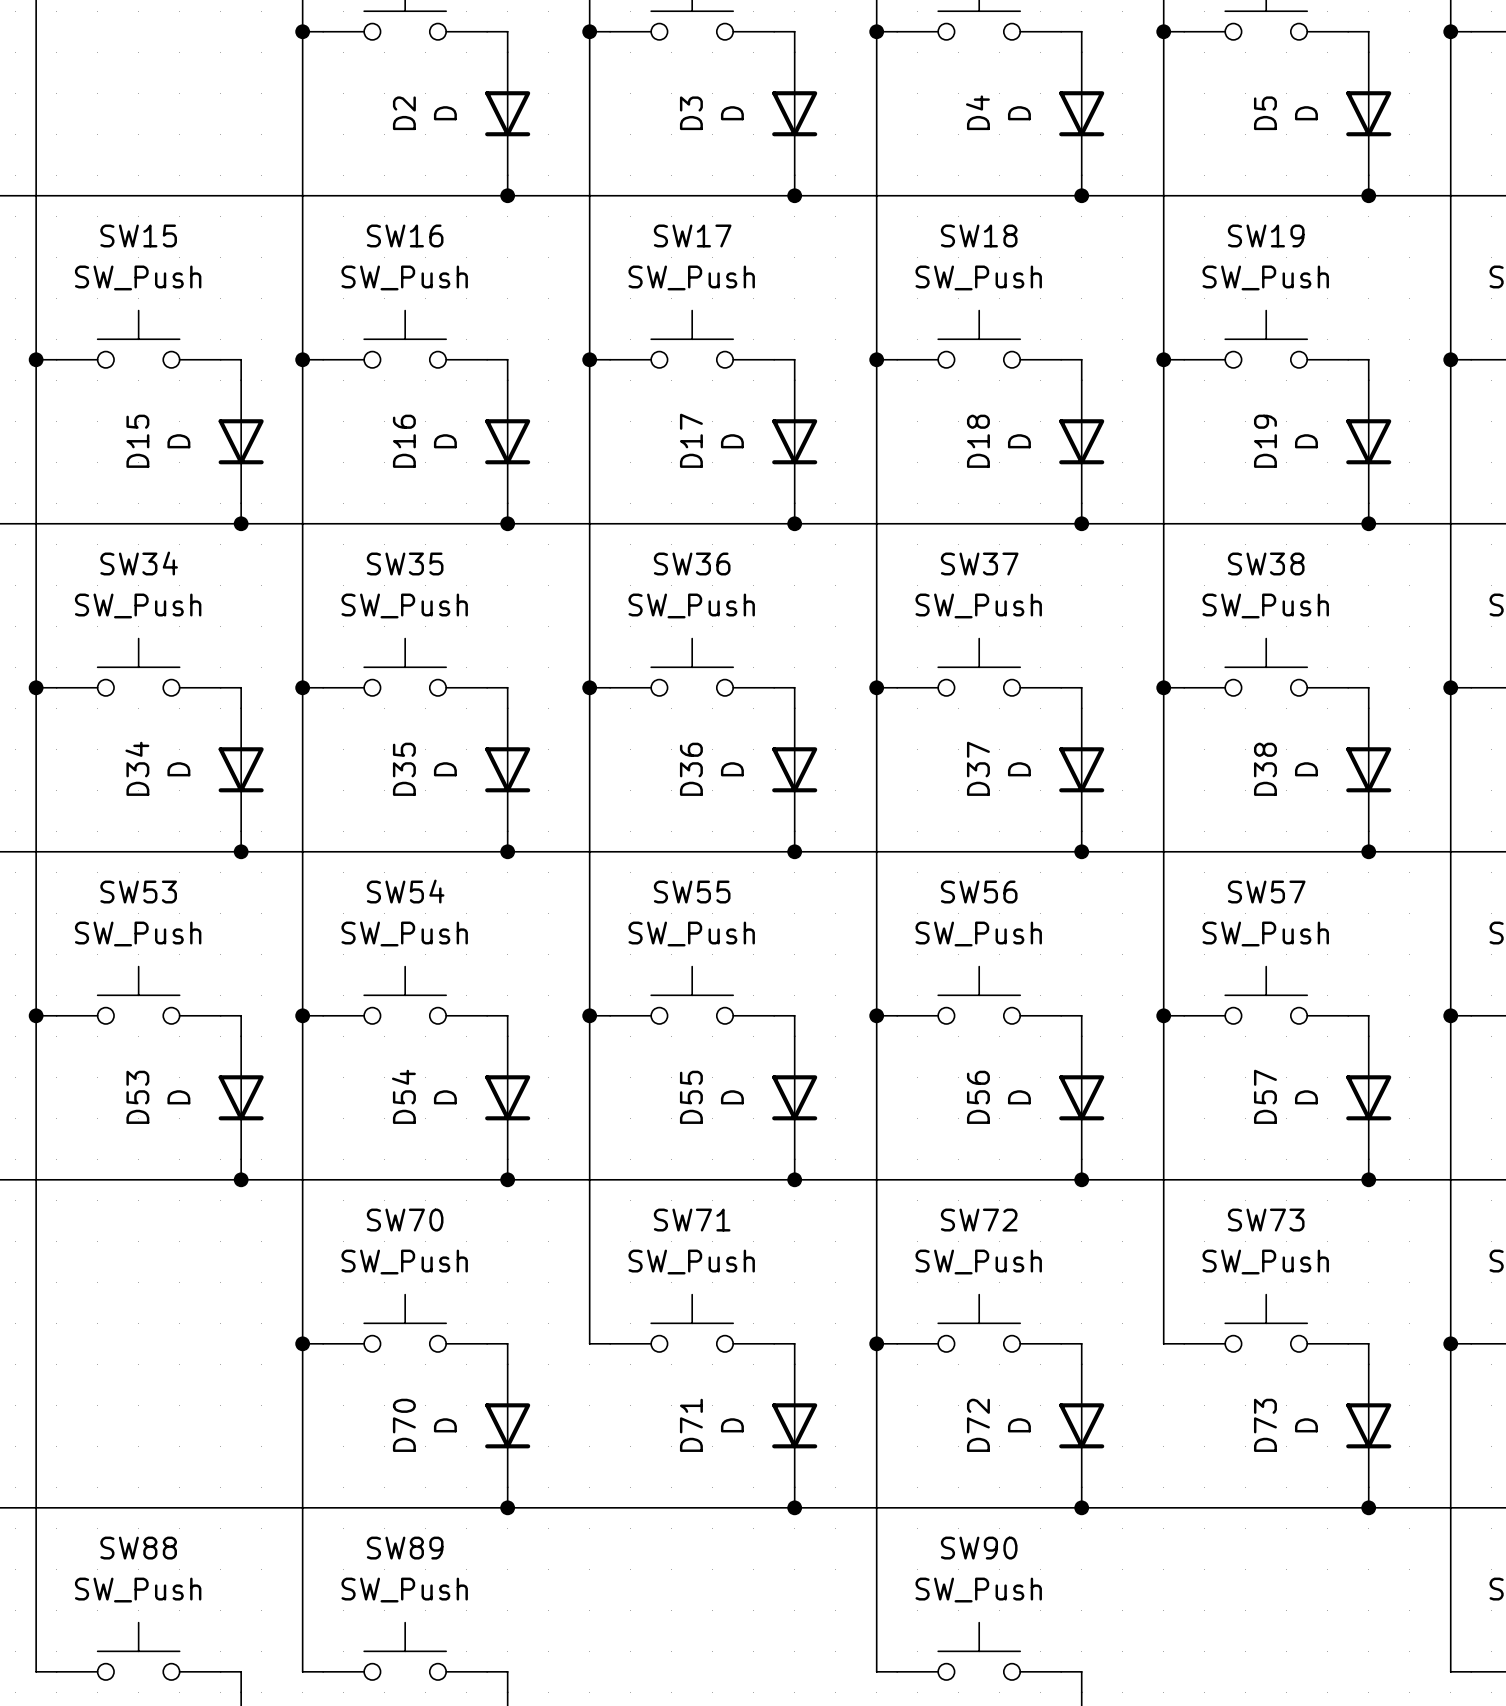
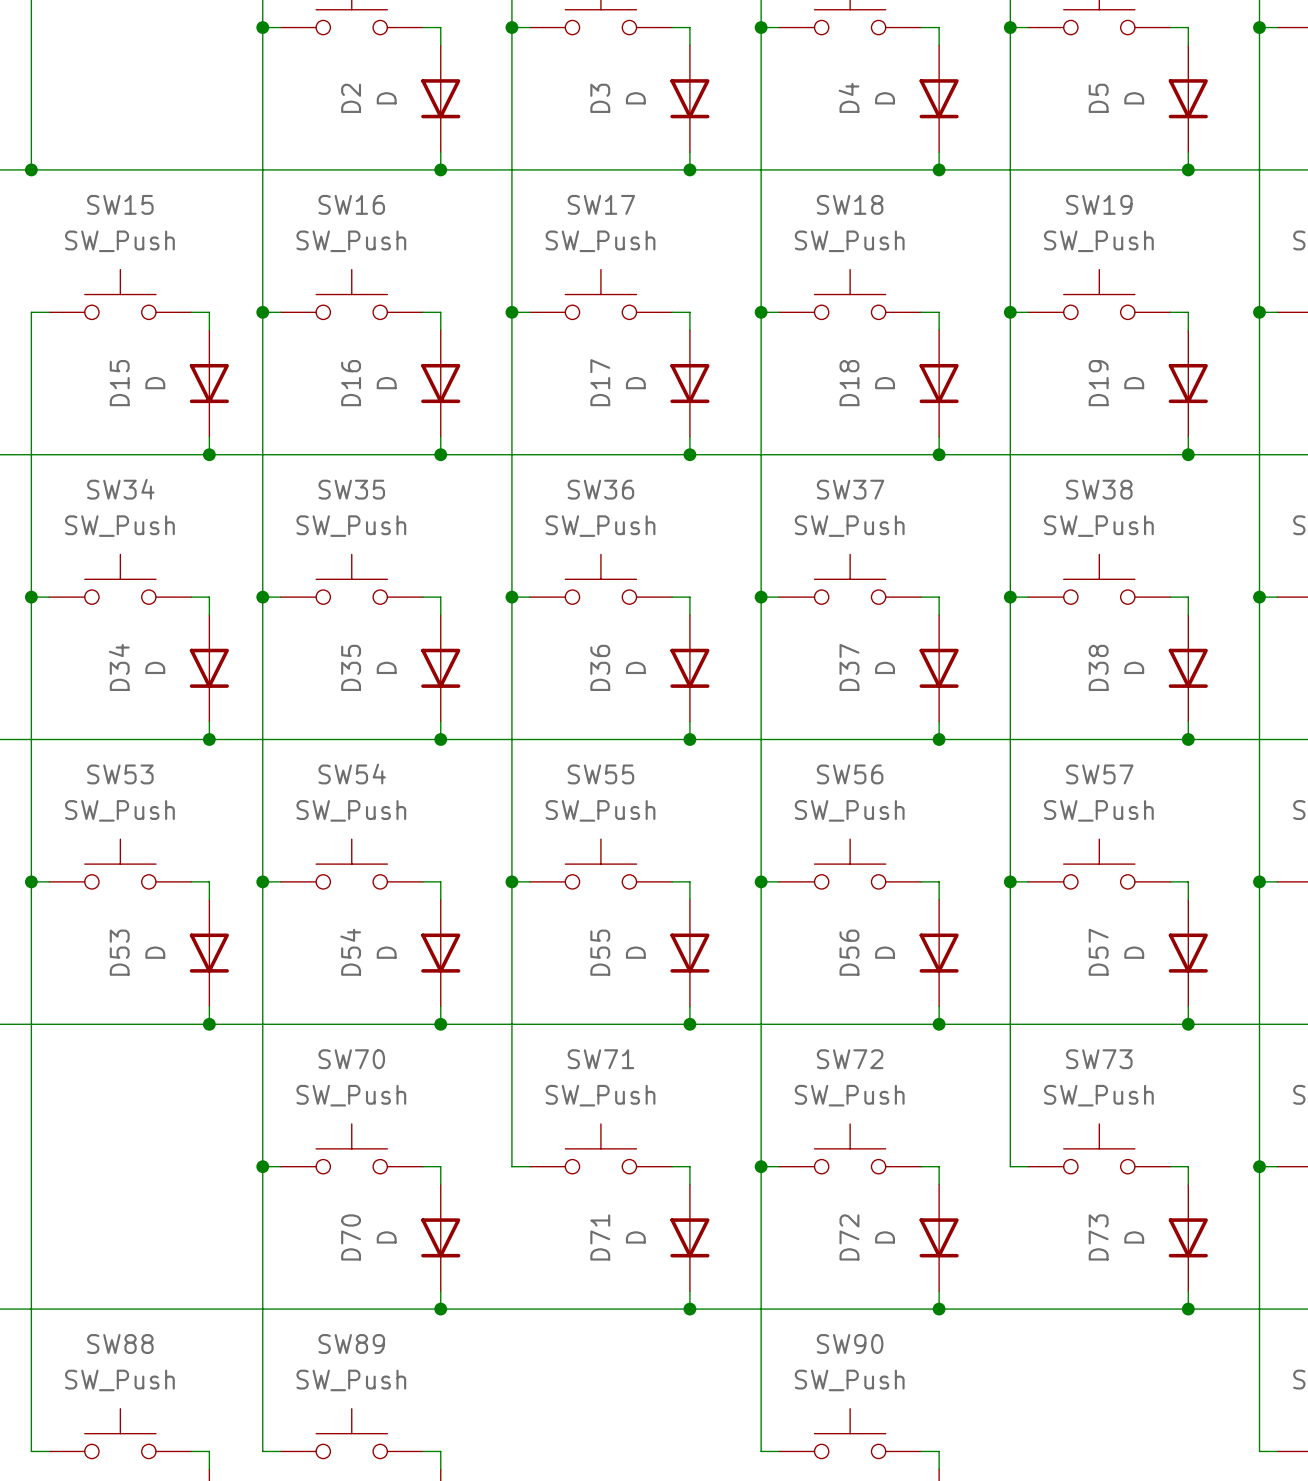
wire: (36, 195) (36, 359) -> none
junction: none -> (31, 169)
junction: (36, 359) -> none

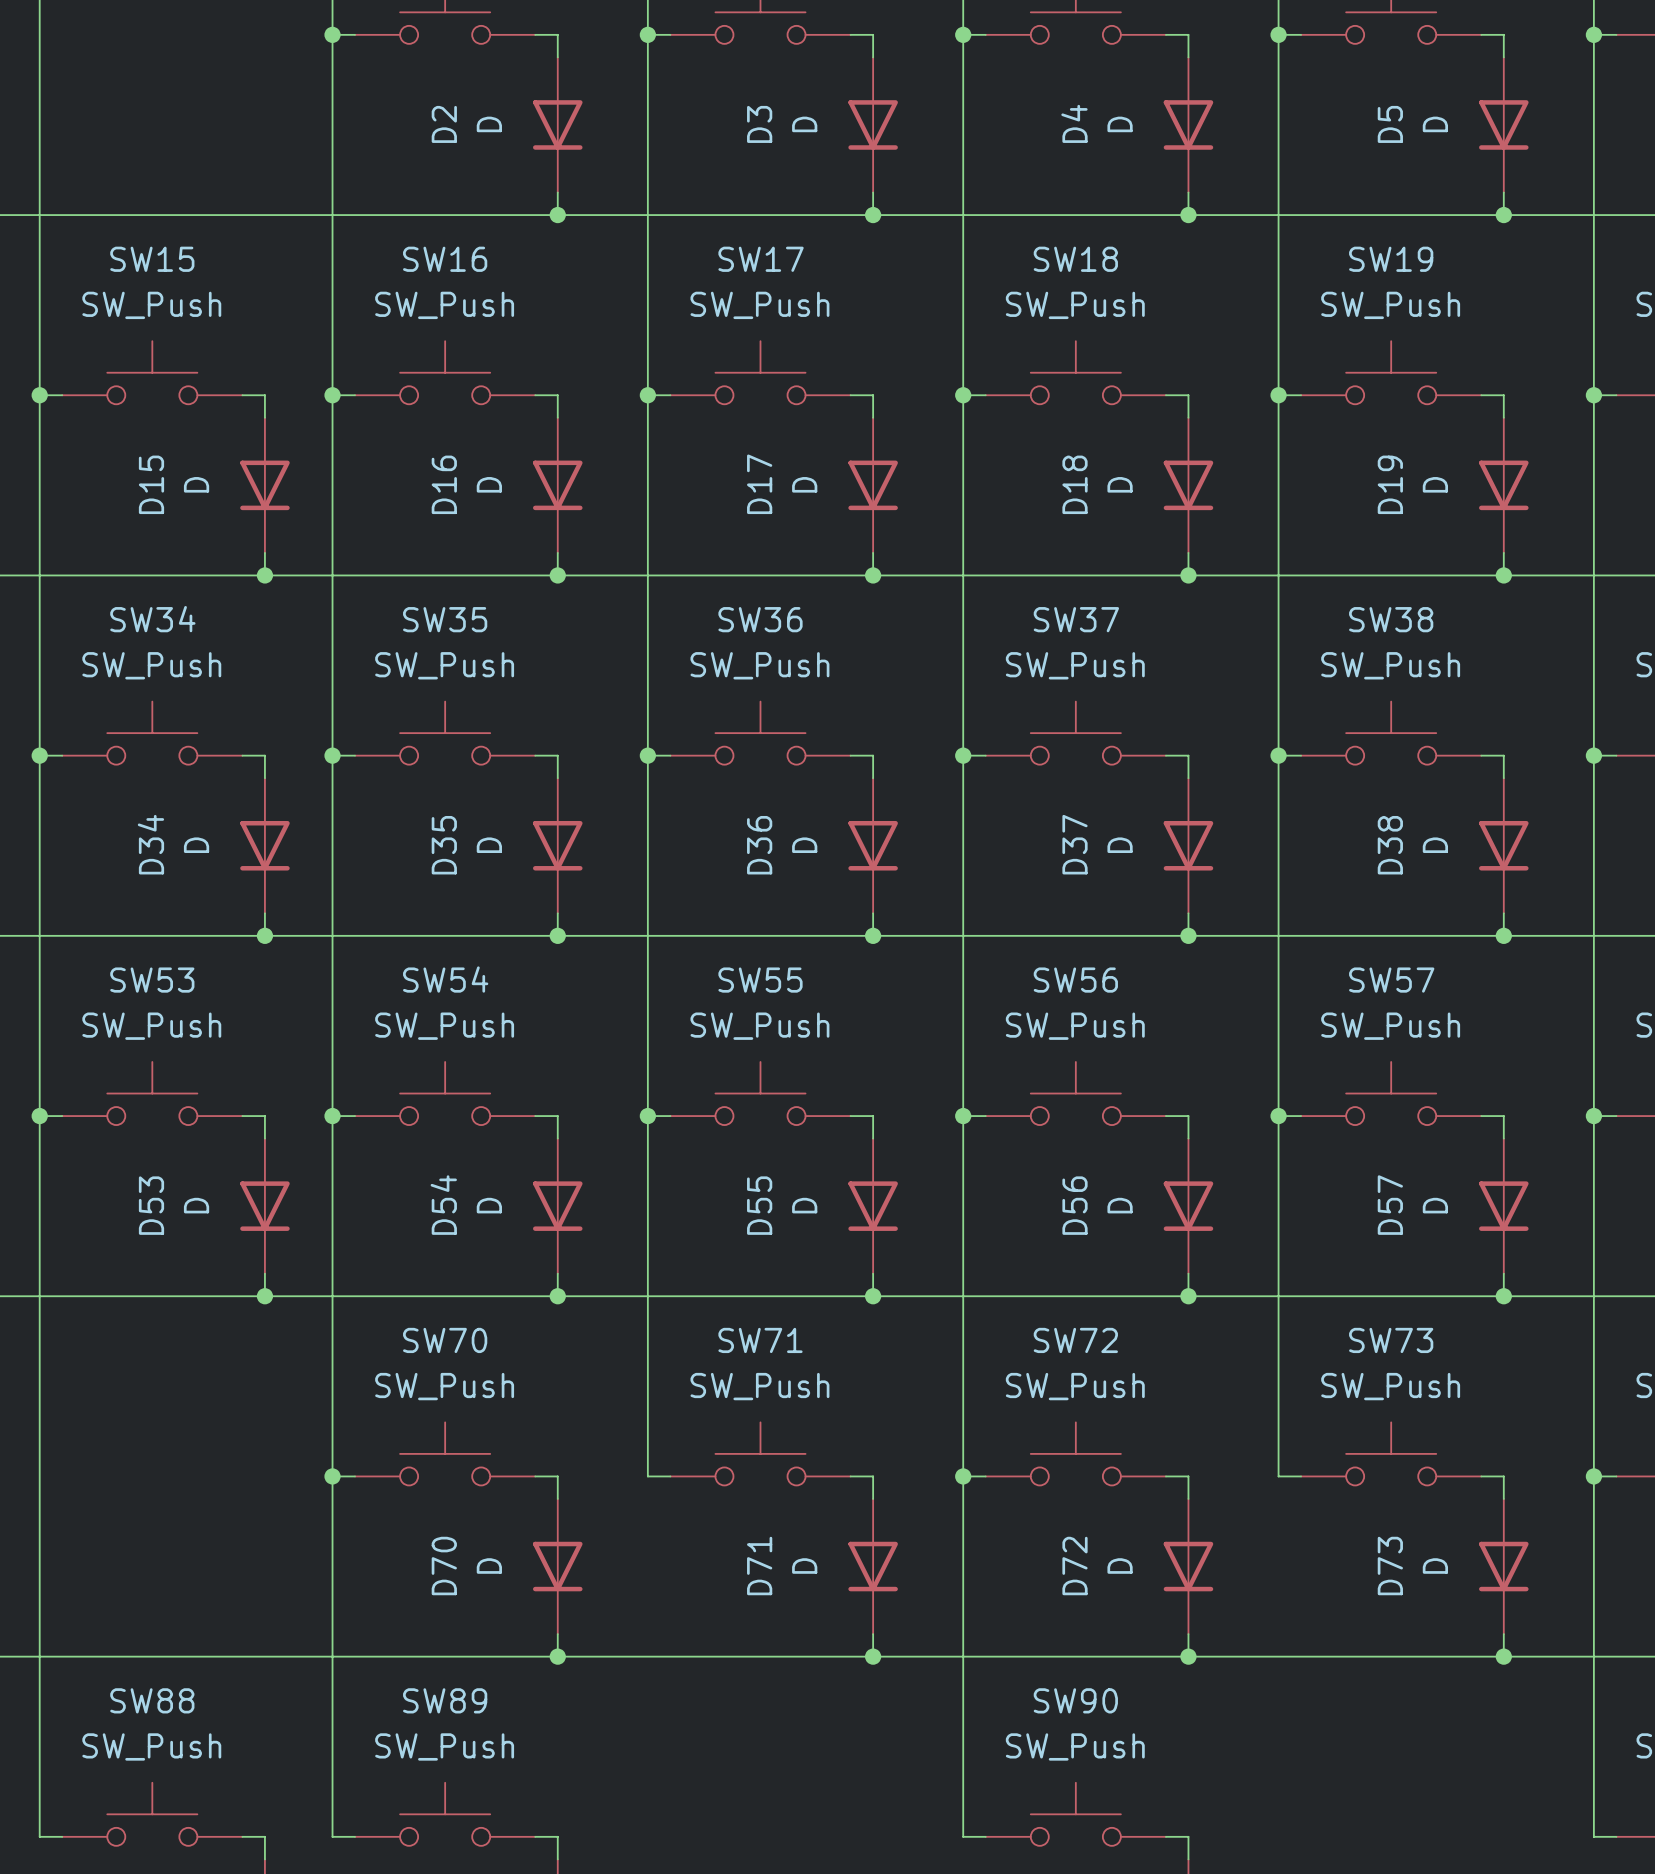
wire: none -> (39, 215) (39, 395)
junction: (31, 169) -> none
junction: none -> (39, 395)

